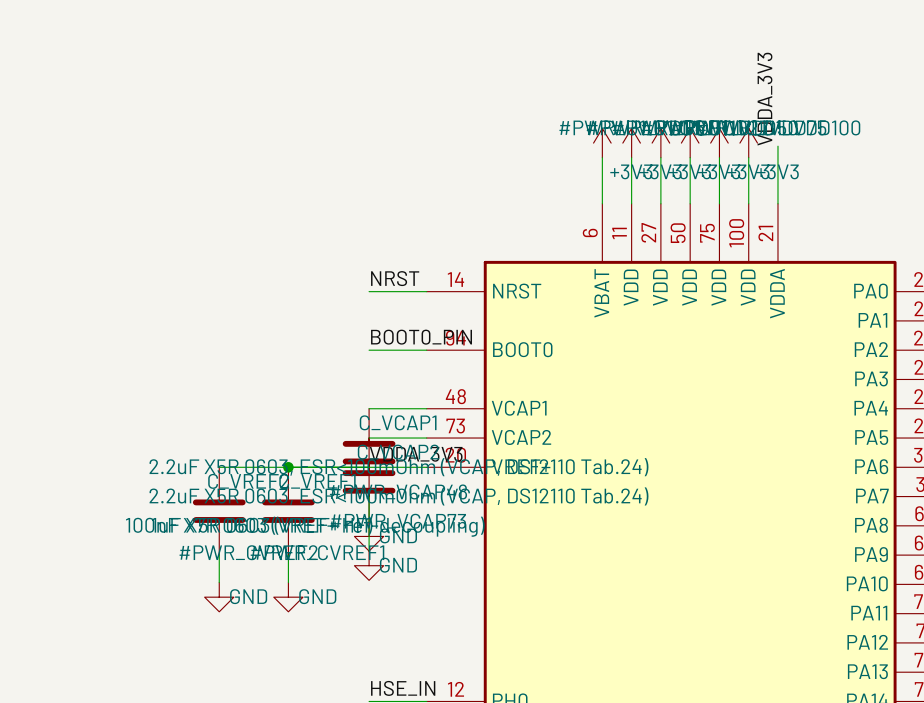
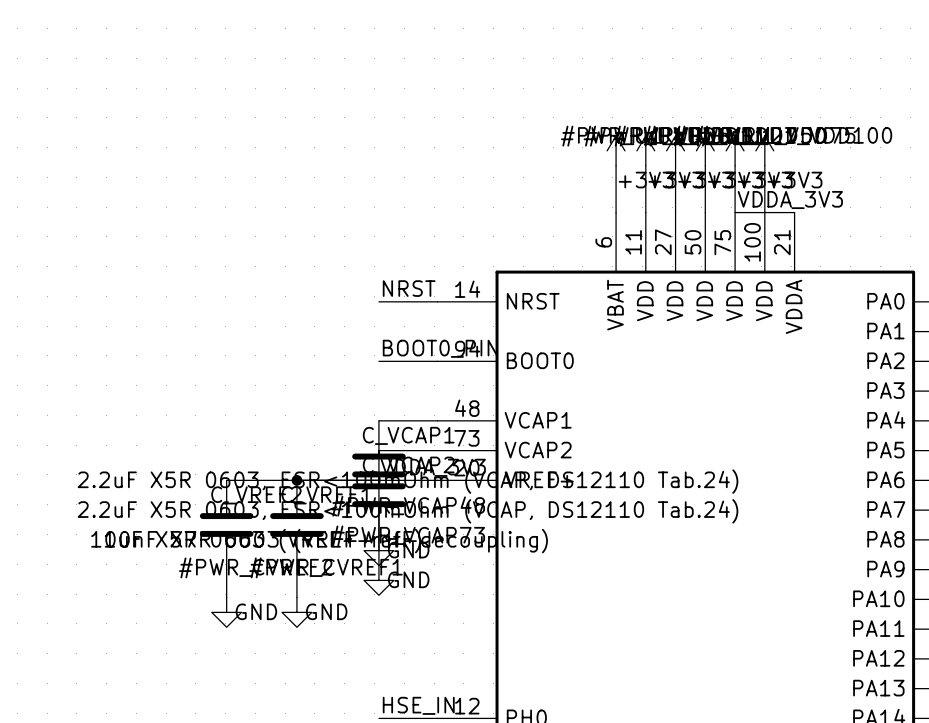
label rotation: 0° (765, 99) -> 90° clockwise (790, 200)
wire: (777, 146) (777, 203) -> (736, 212) (794, 212)

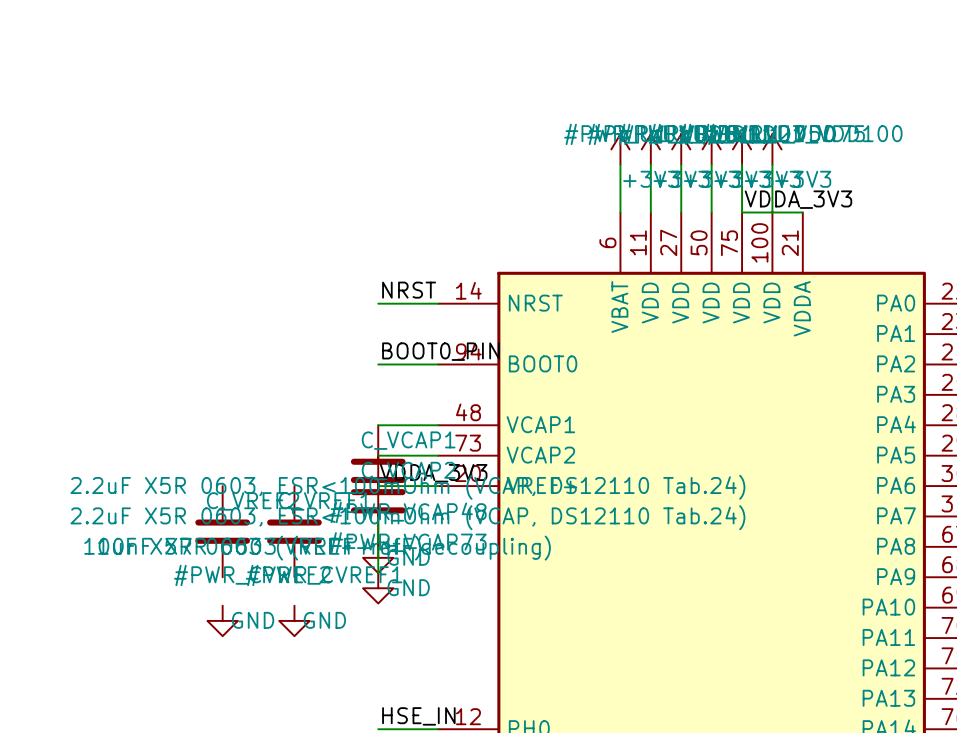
wire: (226, 480) (378, 480) -> none
junction: (296, 480) -> none
wire: (226, 569) (226, 597) -> none
wire: (296, 569) (296, 597) -> none

